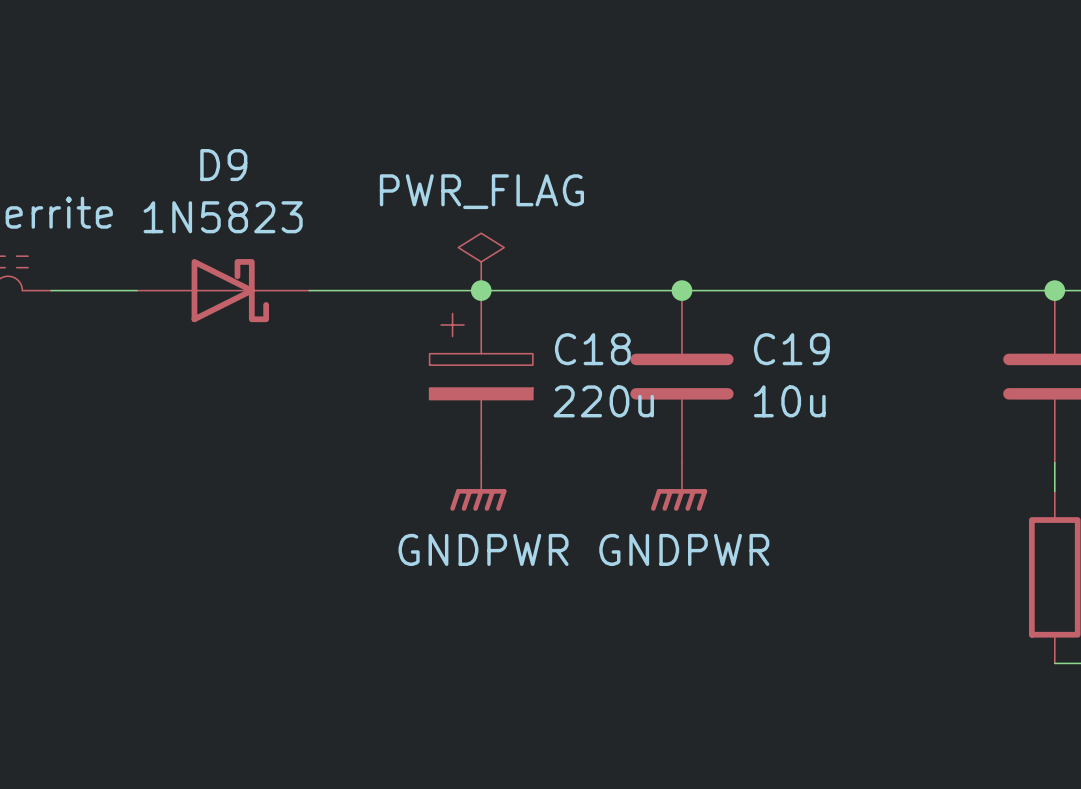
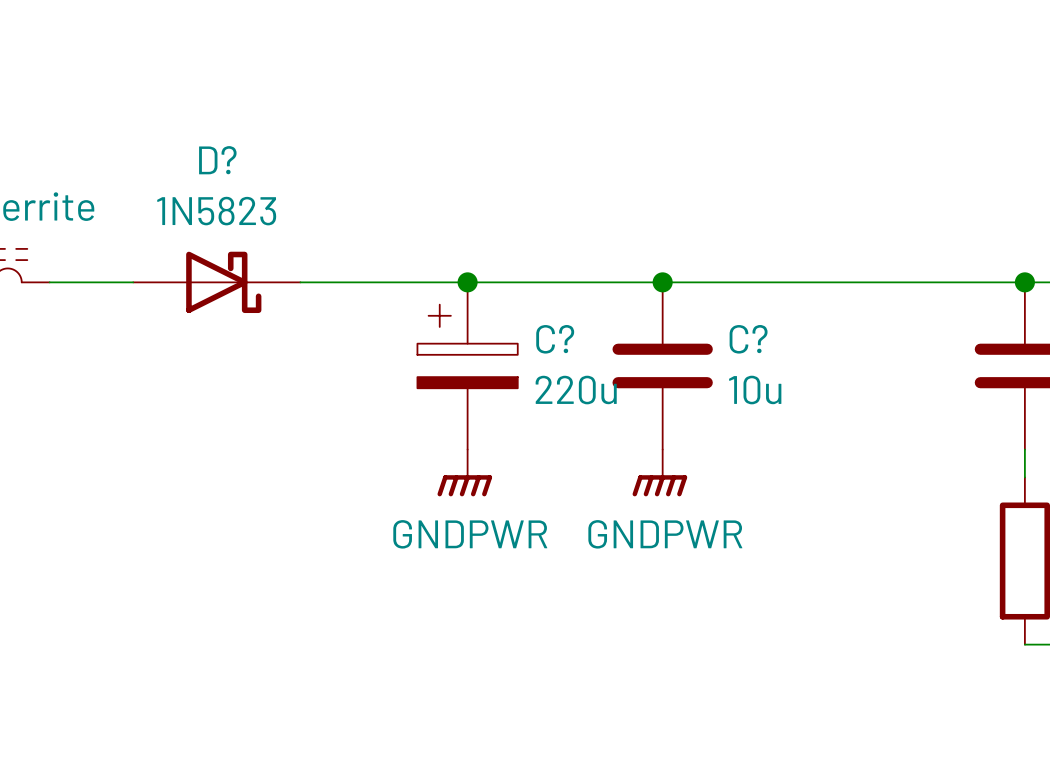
D9 name: D9 (223, 165) -> D? (217, 160)
power symbol: PWR_FLAG (481, 261) -> none
C18 name: C18 (592, 349) -> C? (555, 339)
C19 name: C19 (791, 349) -> C? (748, 339)

